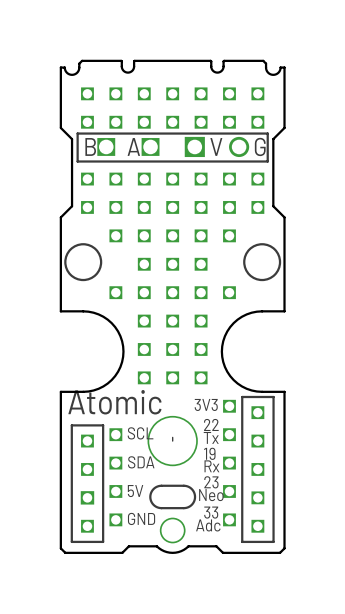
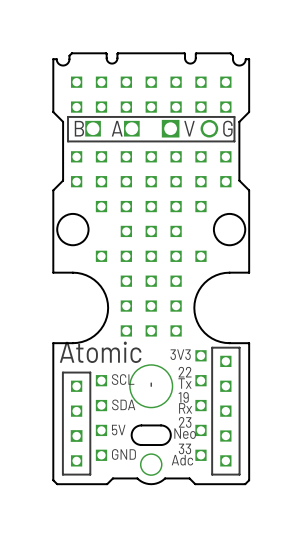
drawing: [64, 243, 103, 282] -> none
round board edge: none -> [56, 212, 90, 247]
drawing: [243, 243, 282, 282] -> none
round board edge: none -> [212, 212, 247, 247]
line: (161, 485) (189, 487) (194, 494) (193, 502) (185, 508) (155, 506) (151, 501) (150, 494) (154, 488) (161, 485) -> none
board edge: none -> (141, 425) (165, 426) (170, 432) (169, 440) (162, 444) (136, 443) (132, 438) (131, 432) (135, 427) (141, 425)

